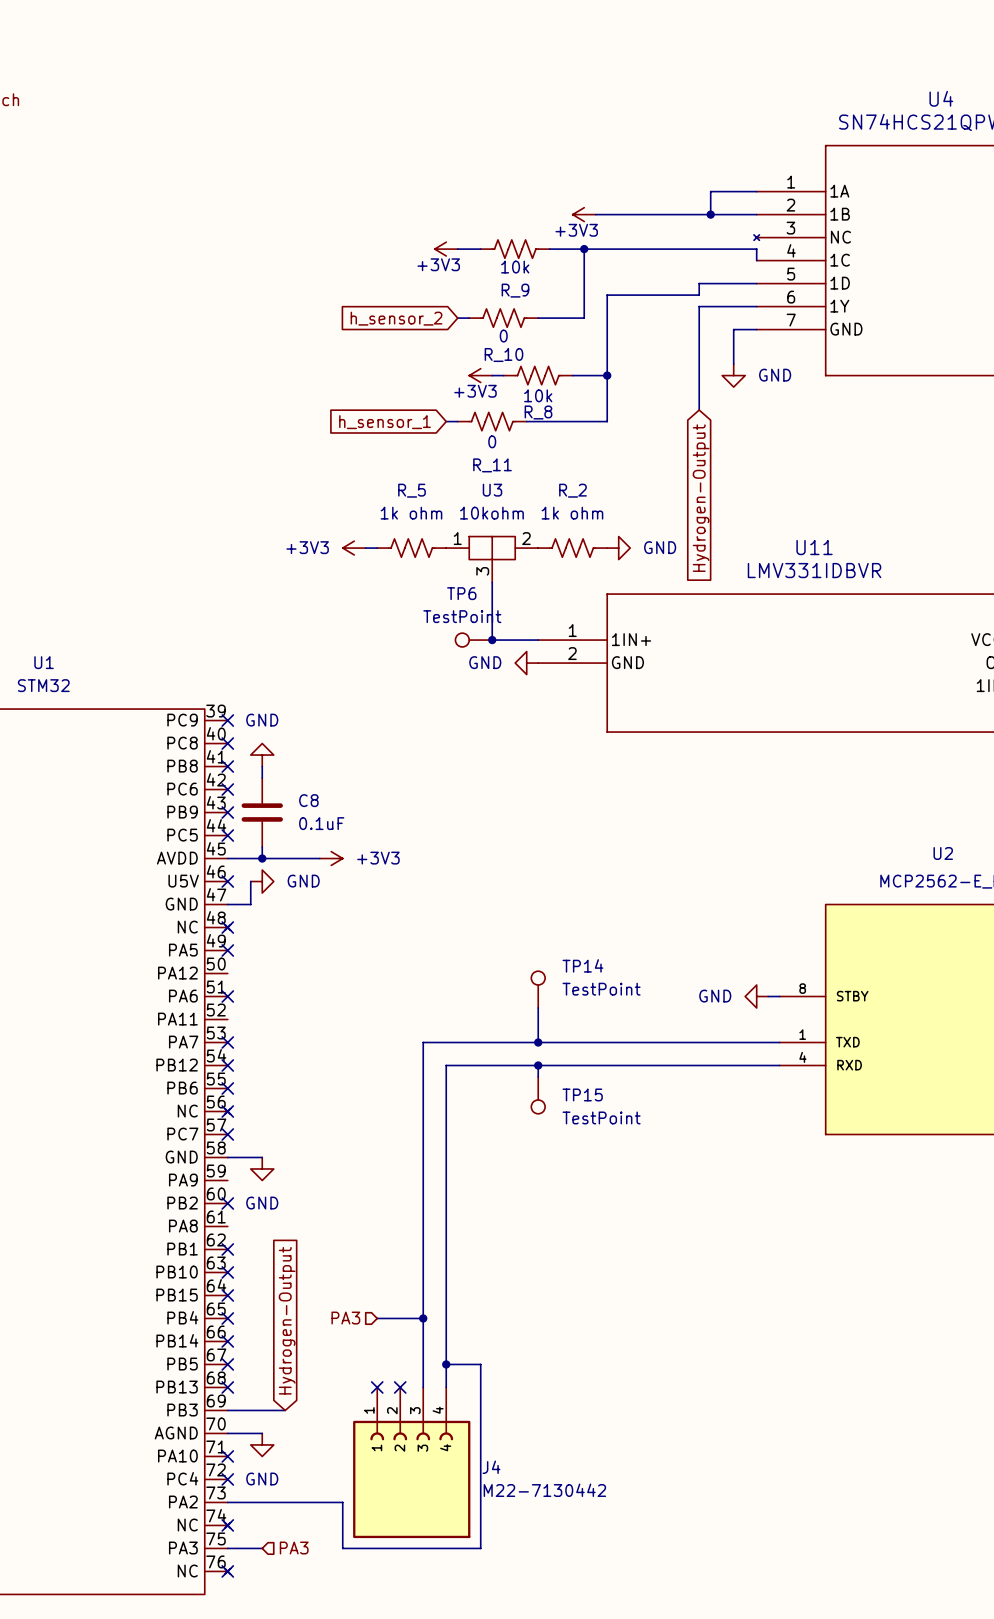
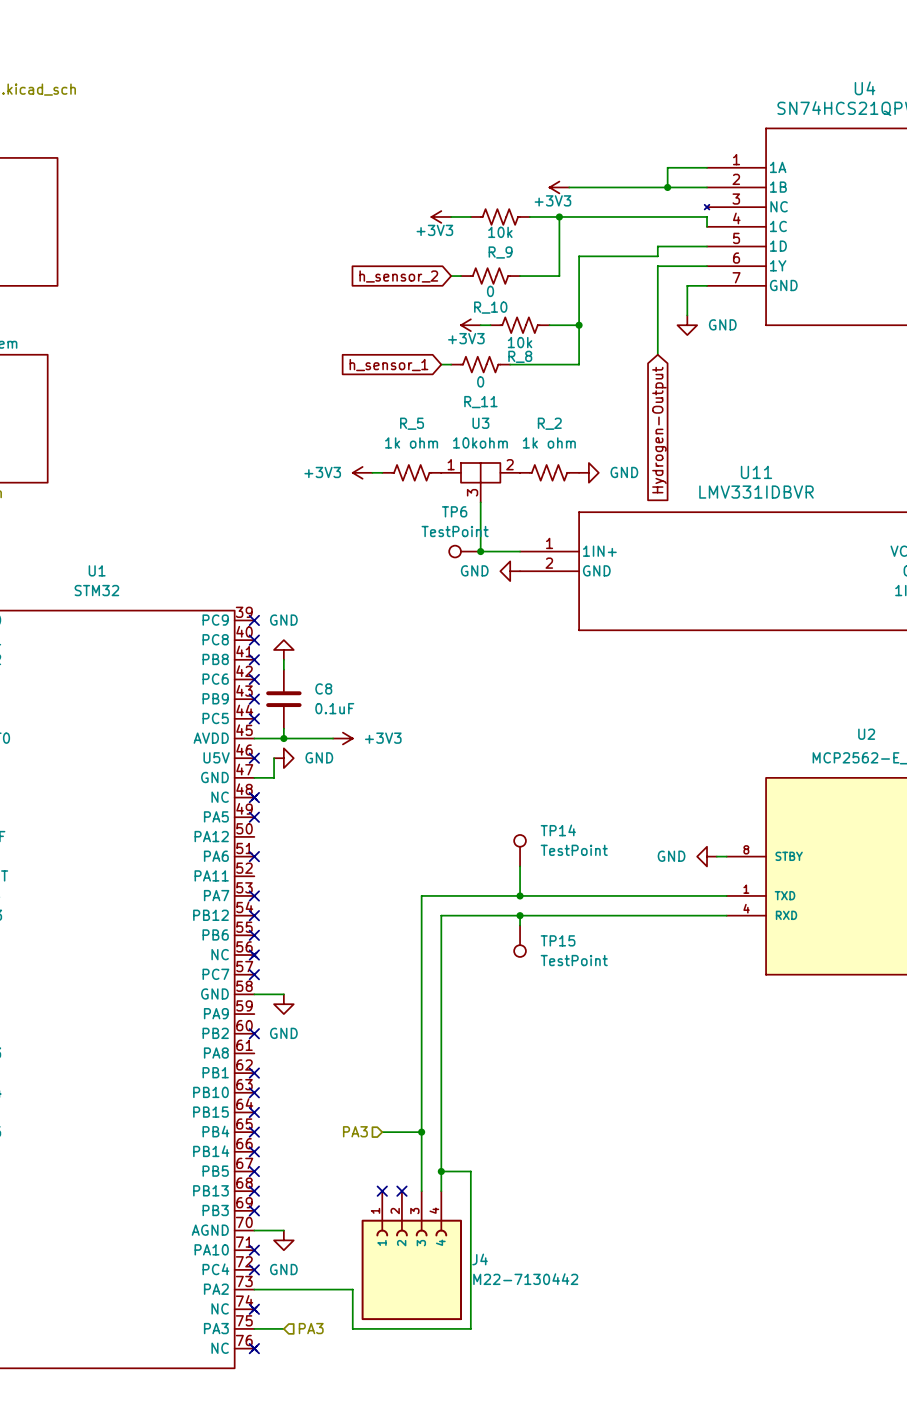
global label: Hydrogen-Output (287, 1320) -> none
wire: (227, 1410) (285, 1410) -> none
no-connect mark: none -> (254, 1210)

